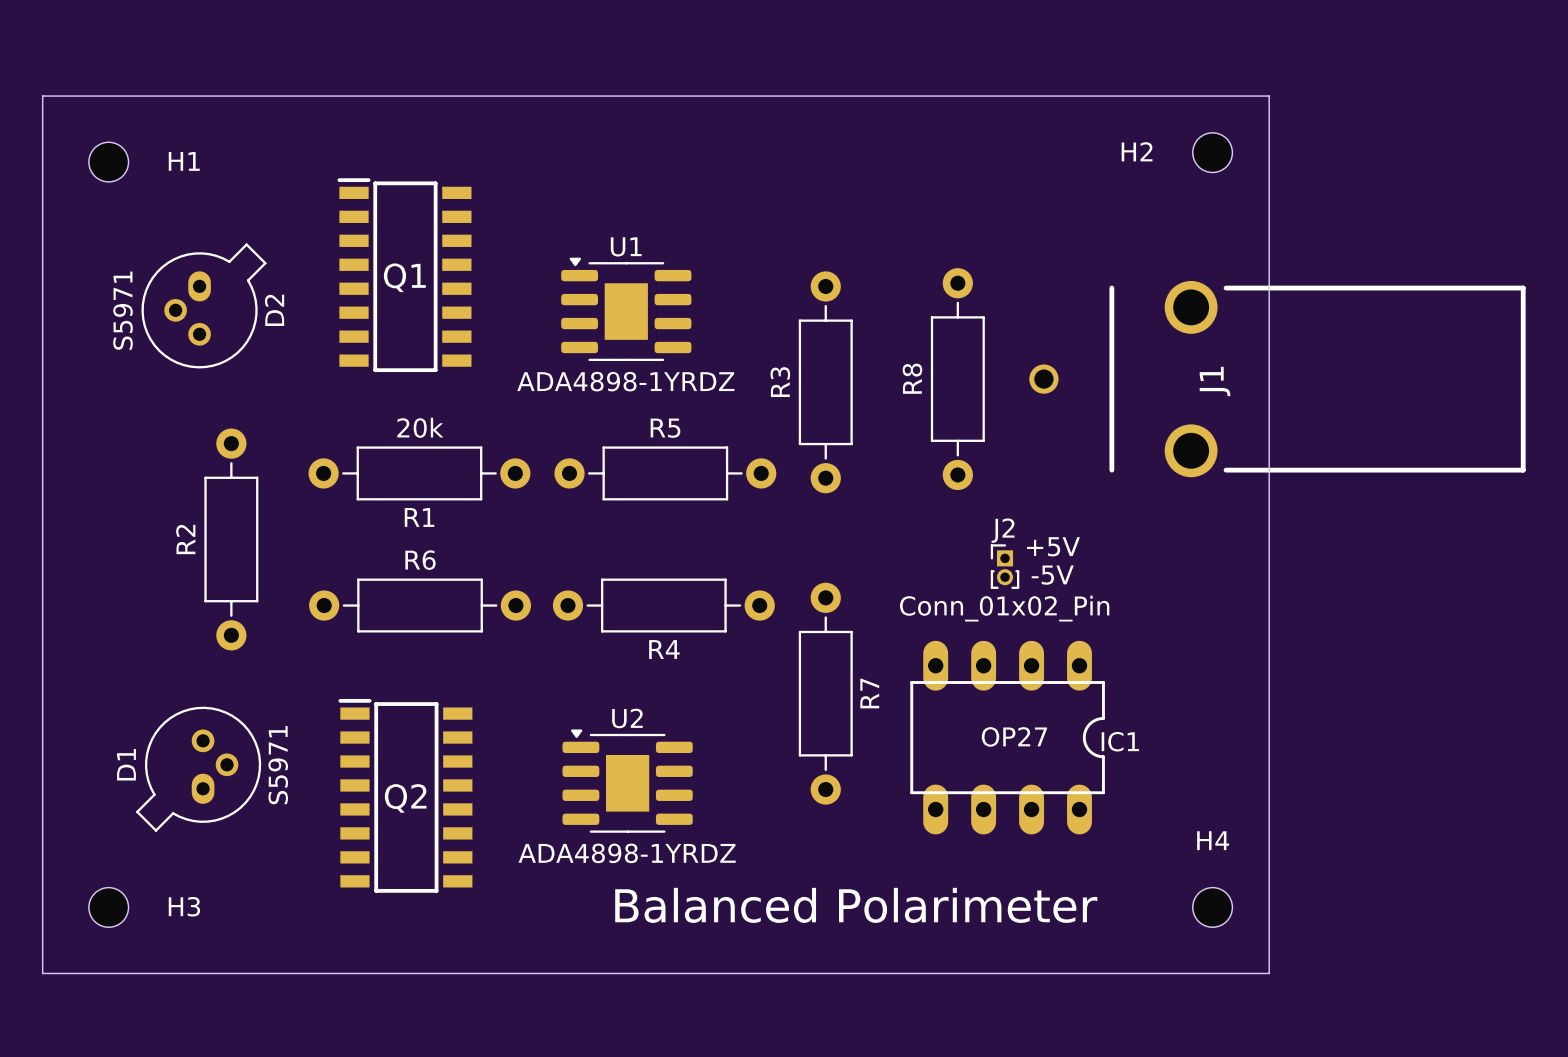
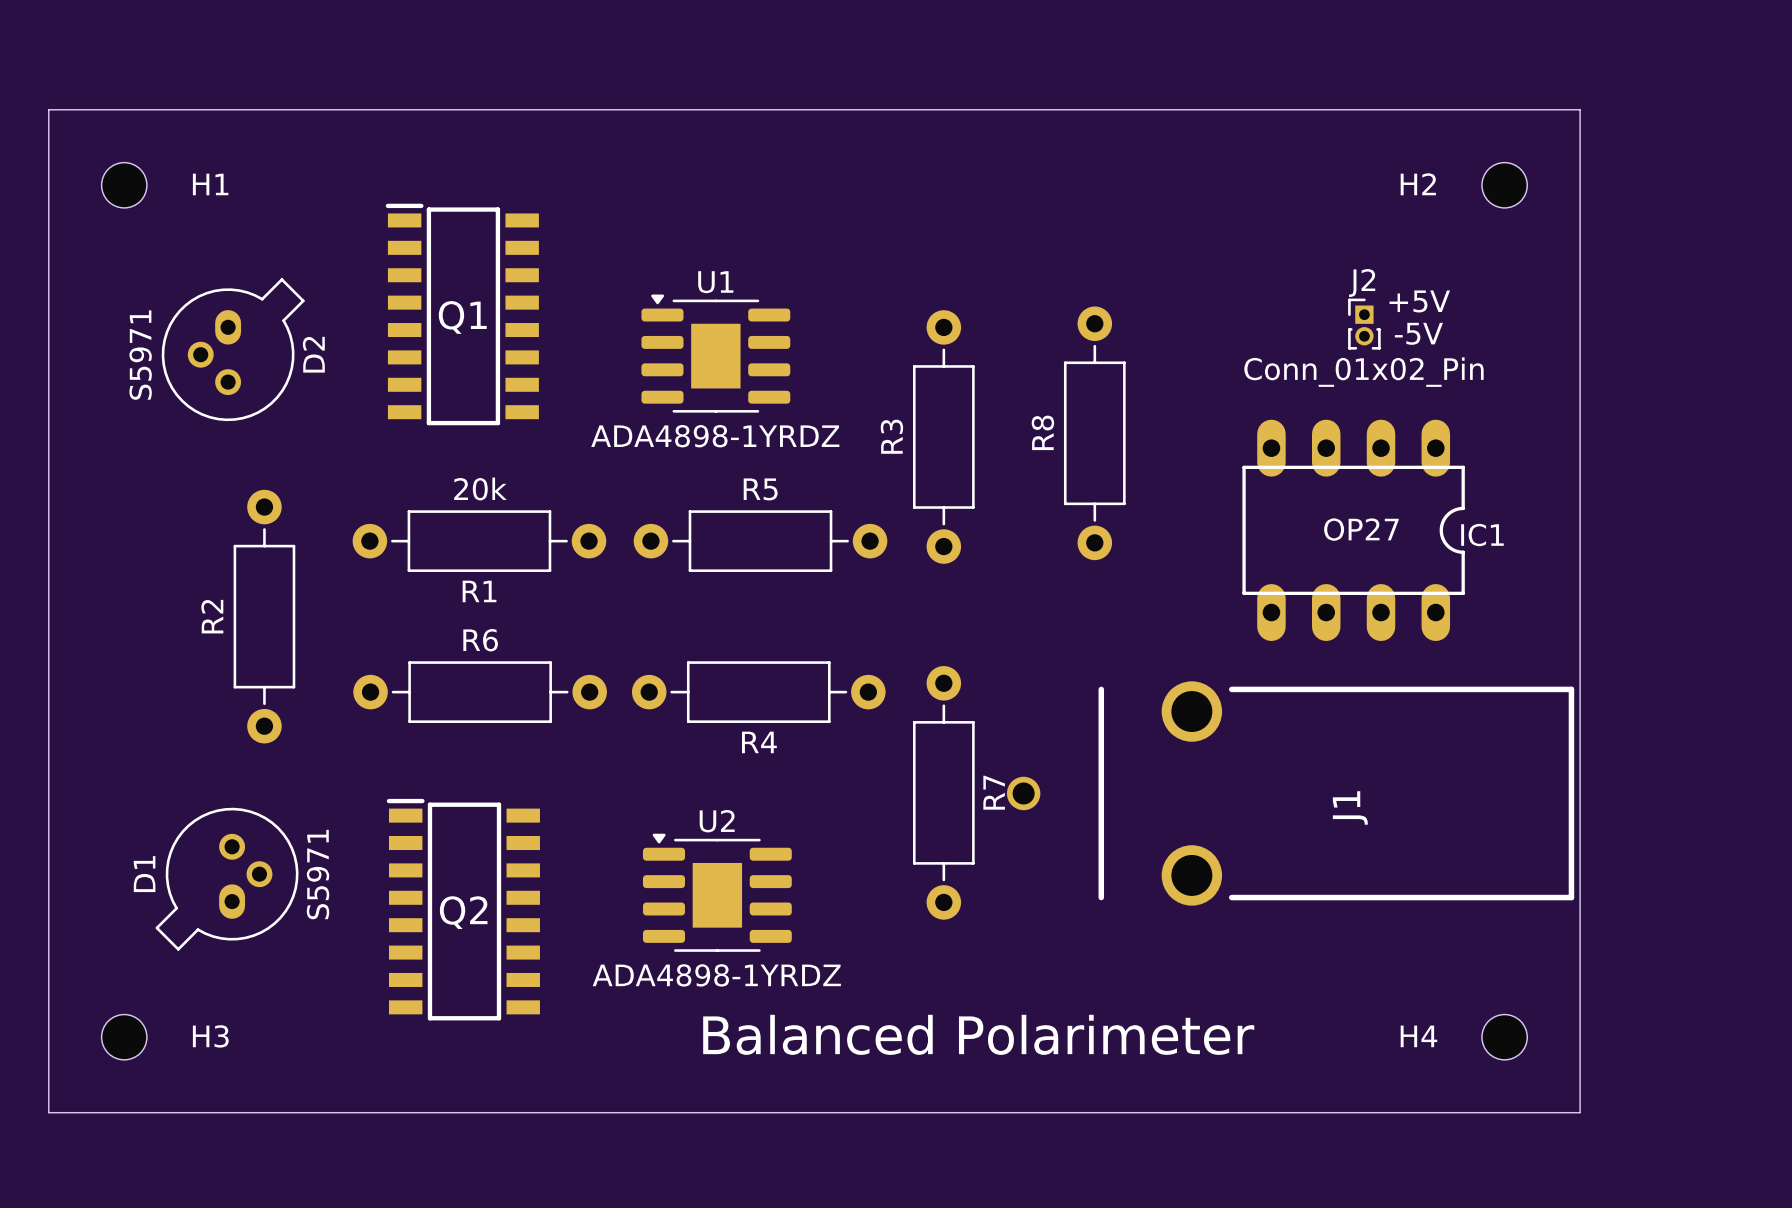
board edge: (1269, 96) (1269, 973) -> (1450, 109) (1580, 109) (1580, 1112) (1450, 1112)
H2 position: (1212, 152) -> (1504, 185)
J1 position: (1277, 379) -> (1290, 793)
J1 name position: J1 (1214, 381) -> J1 (1350, 807)
text position: +5V (1053, 546) -> +5V (1419, 301)
J2 position: (1005, 566) -> (1364, 324)
text position: -5V (1052, 575) -> -5V (1418, 333)
IC1 position: (1007, 737) -> (1353, 530)
H4 name position: H4 (1213, 840) -> H4 (1418, 1036)
H4 position: (1212, 907) -> (1504, 1037)

